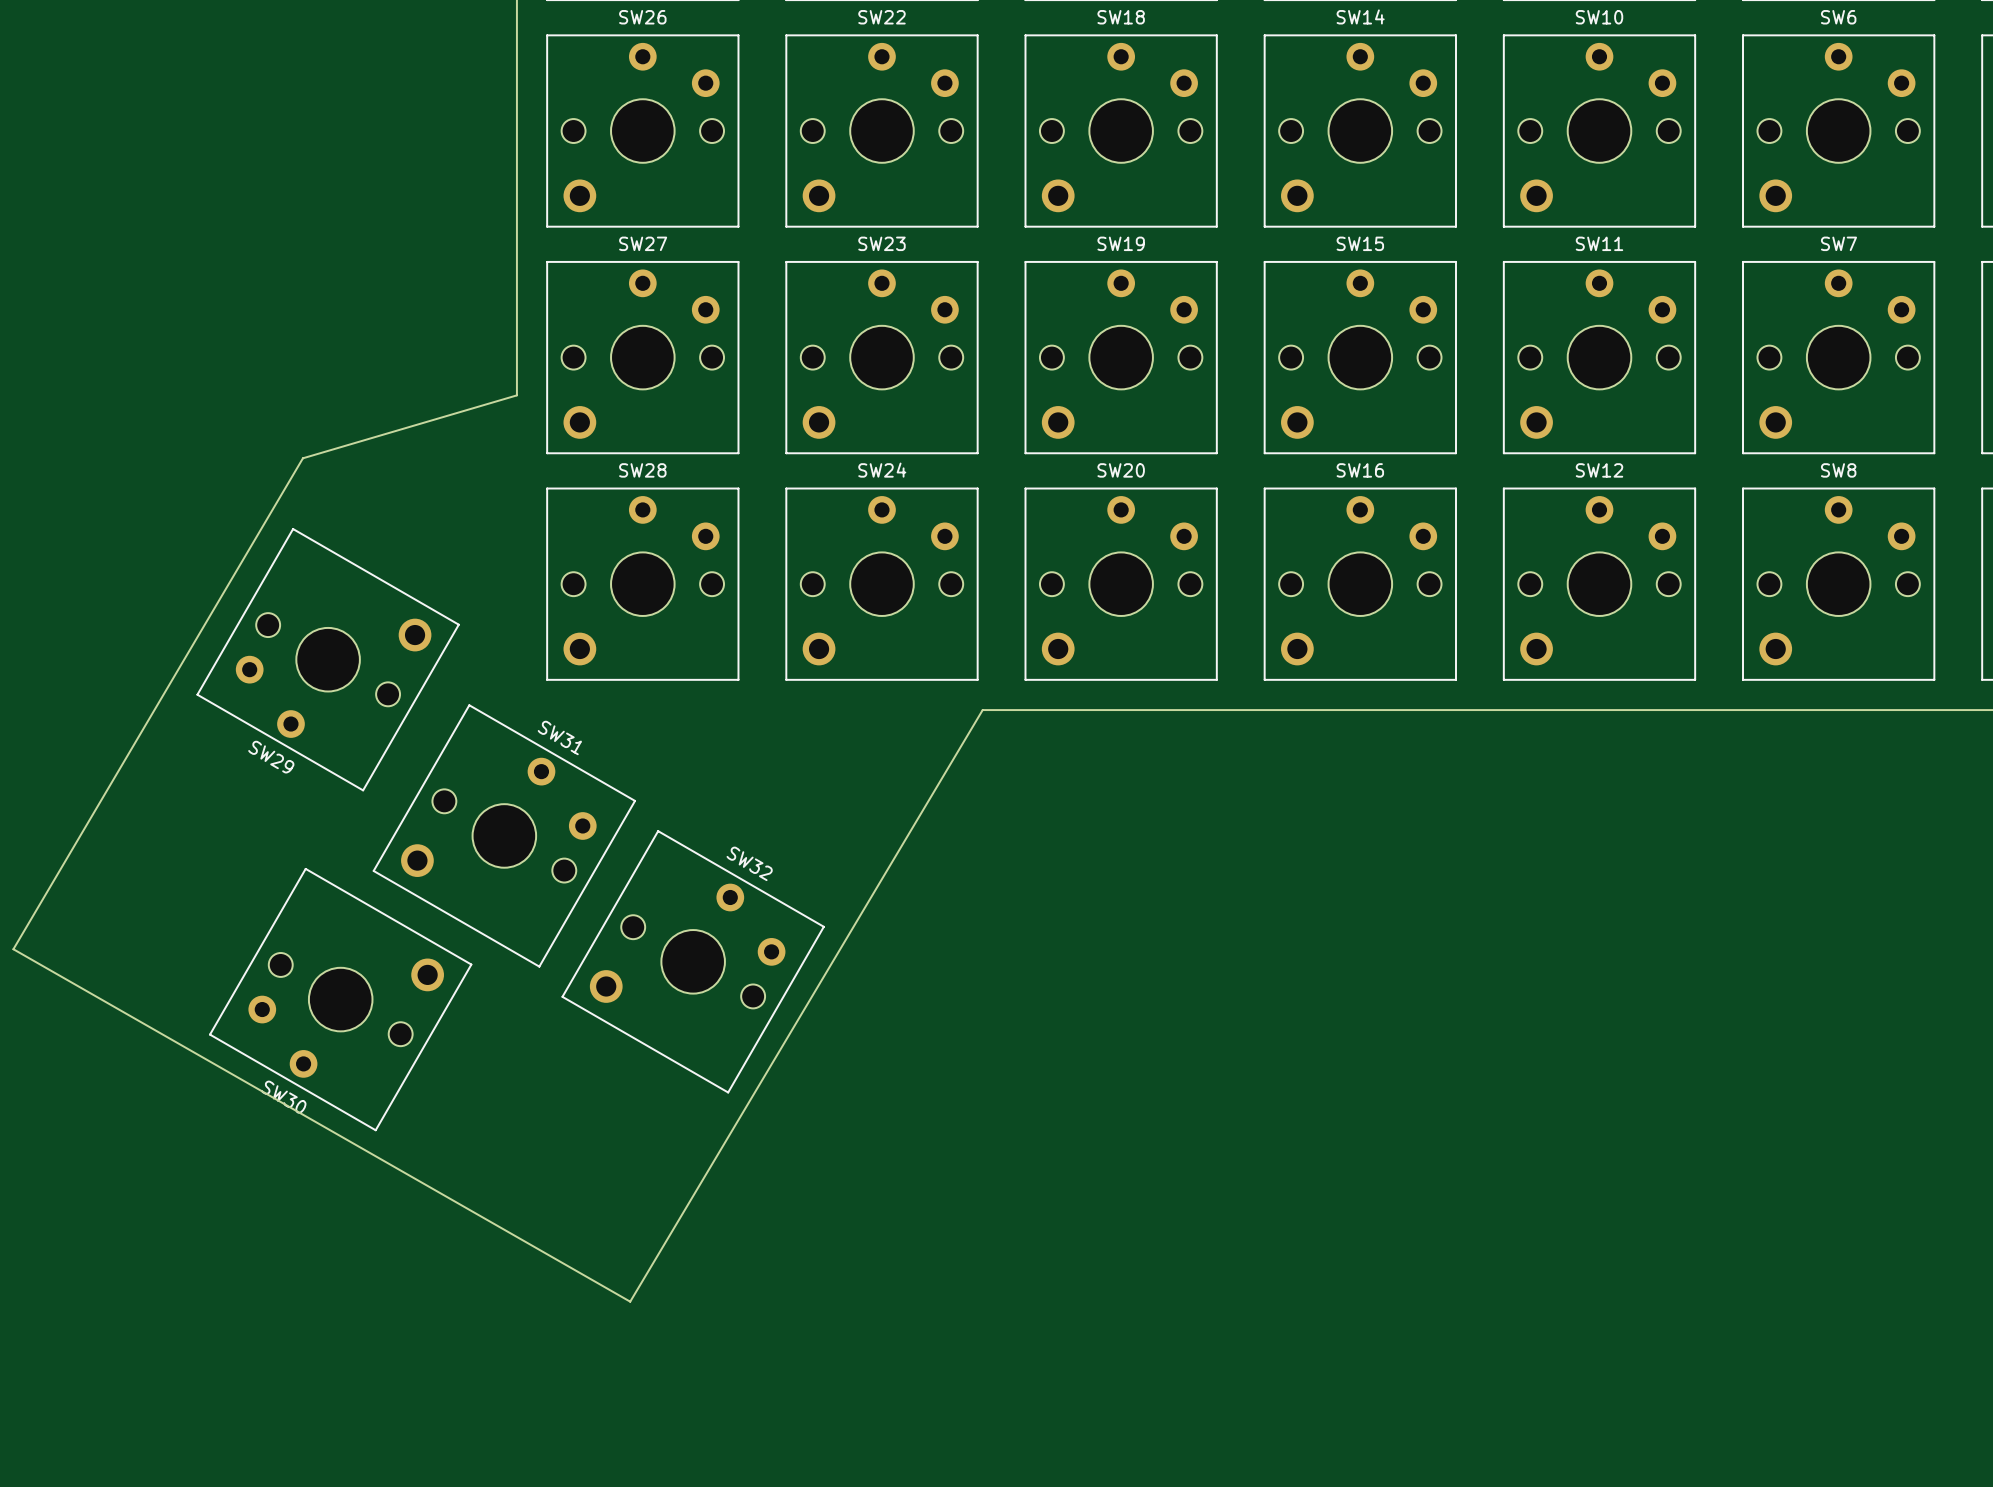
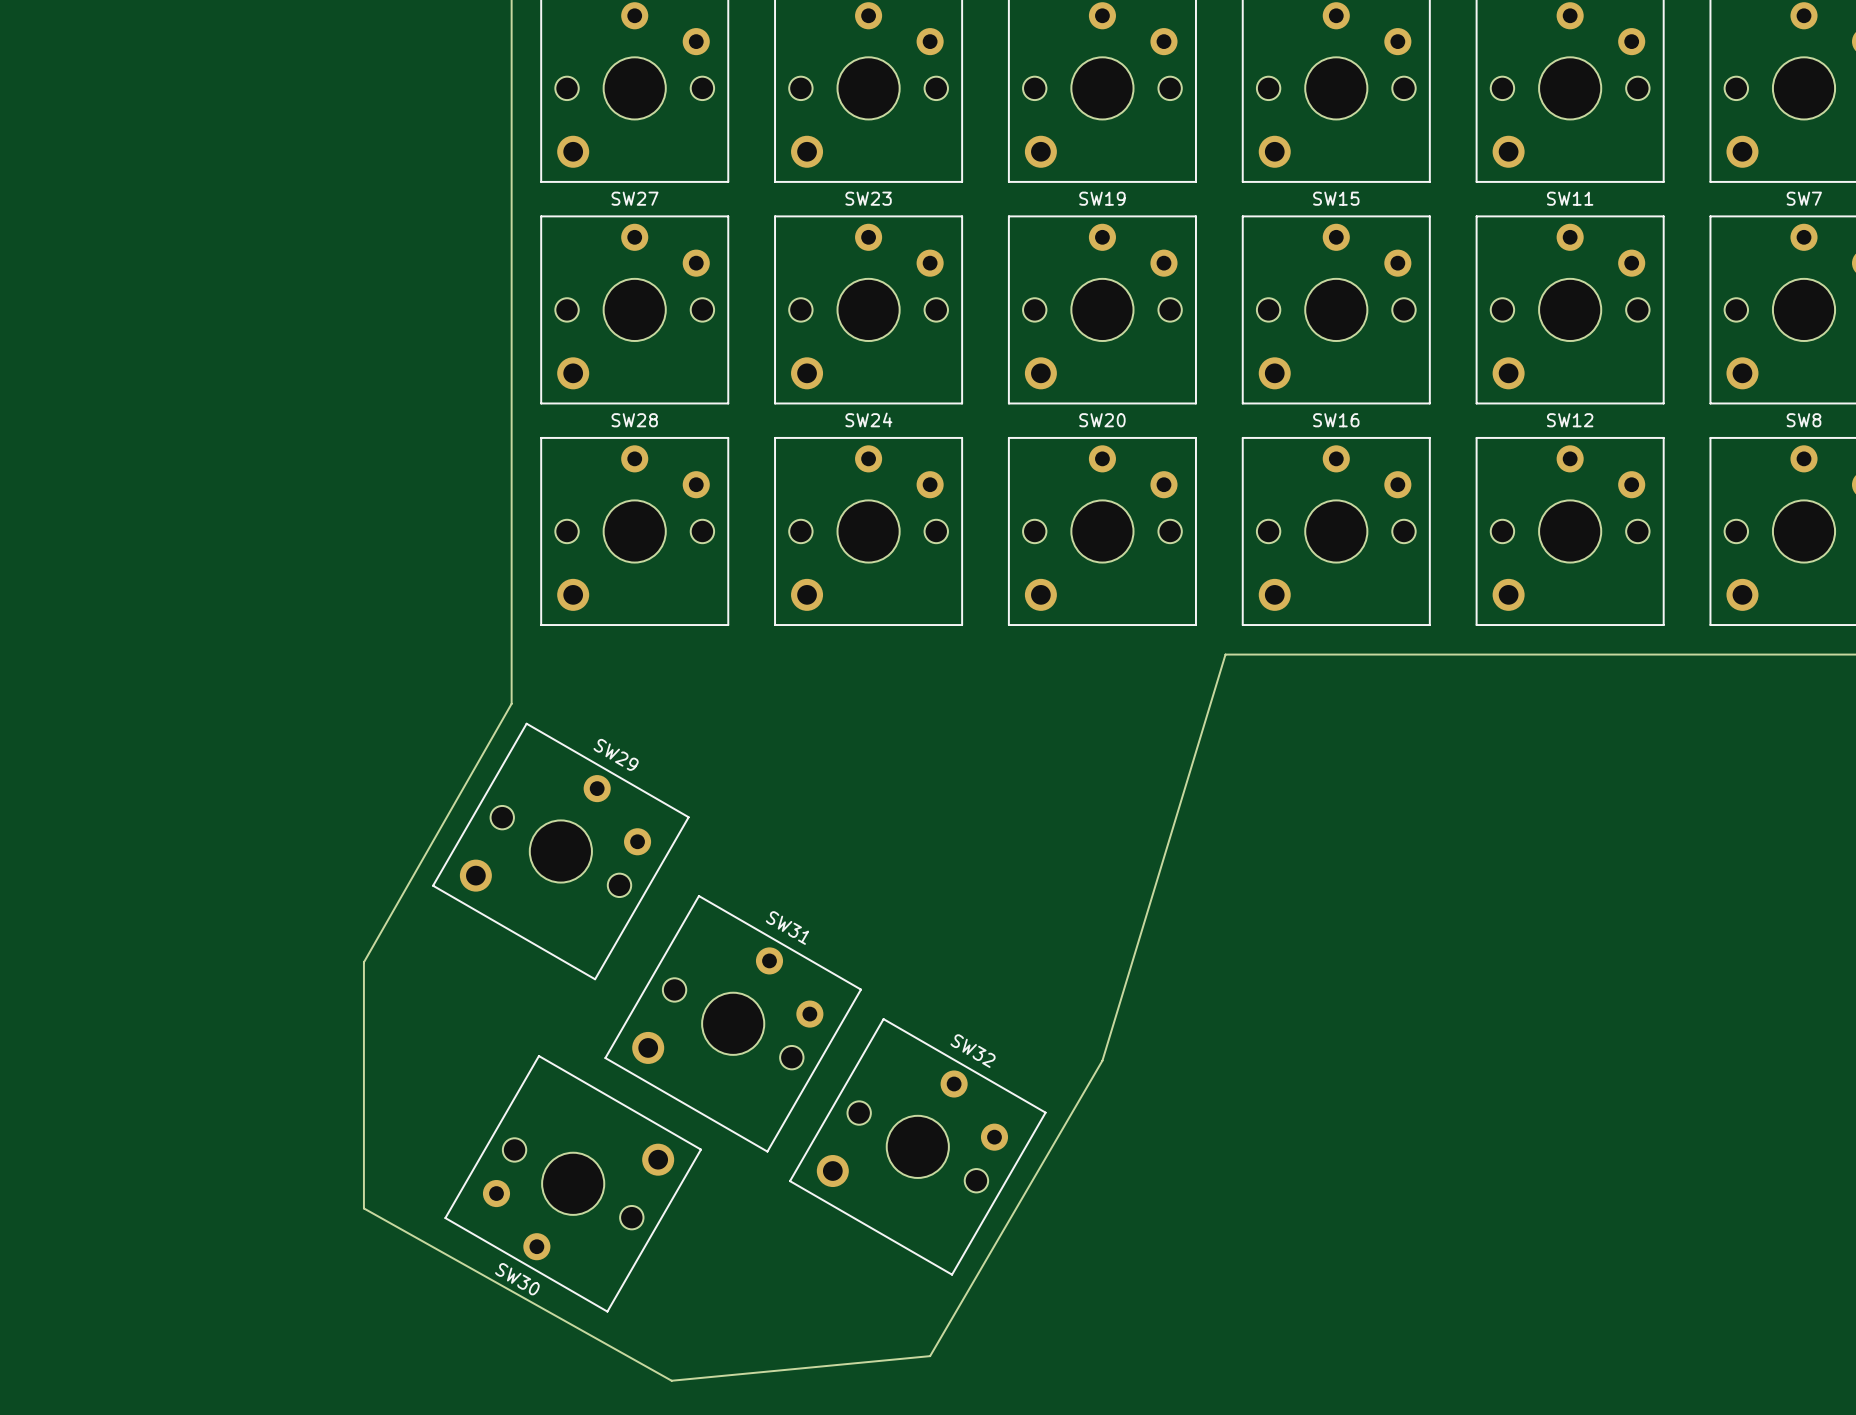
board edge: (516, 395) (302, 458) (13, 949) (630, 1301) (982, 710) (1247, 710) -> (511, 346) (511, 703) (363, 962) (363, 1208) (671, 1380) (930, 1356) (1102, 1060) (1225, 654)
SW29 rotation: 0° (328, 659) -> 180° (560, 851)
SW29 position: (328, 659) -> (560, 851)
SW31 position: (504, 835) -> (733, 1023)
SW32 position: (693, 961) -> (917, 1146)
SW30 position: (340, 999) -> (573, 1183)

